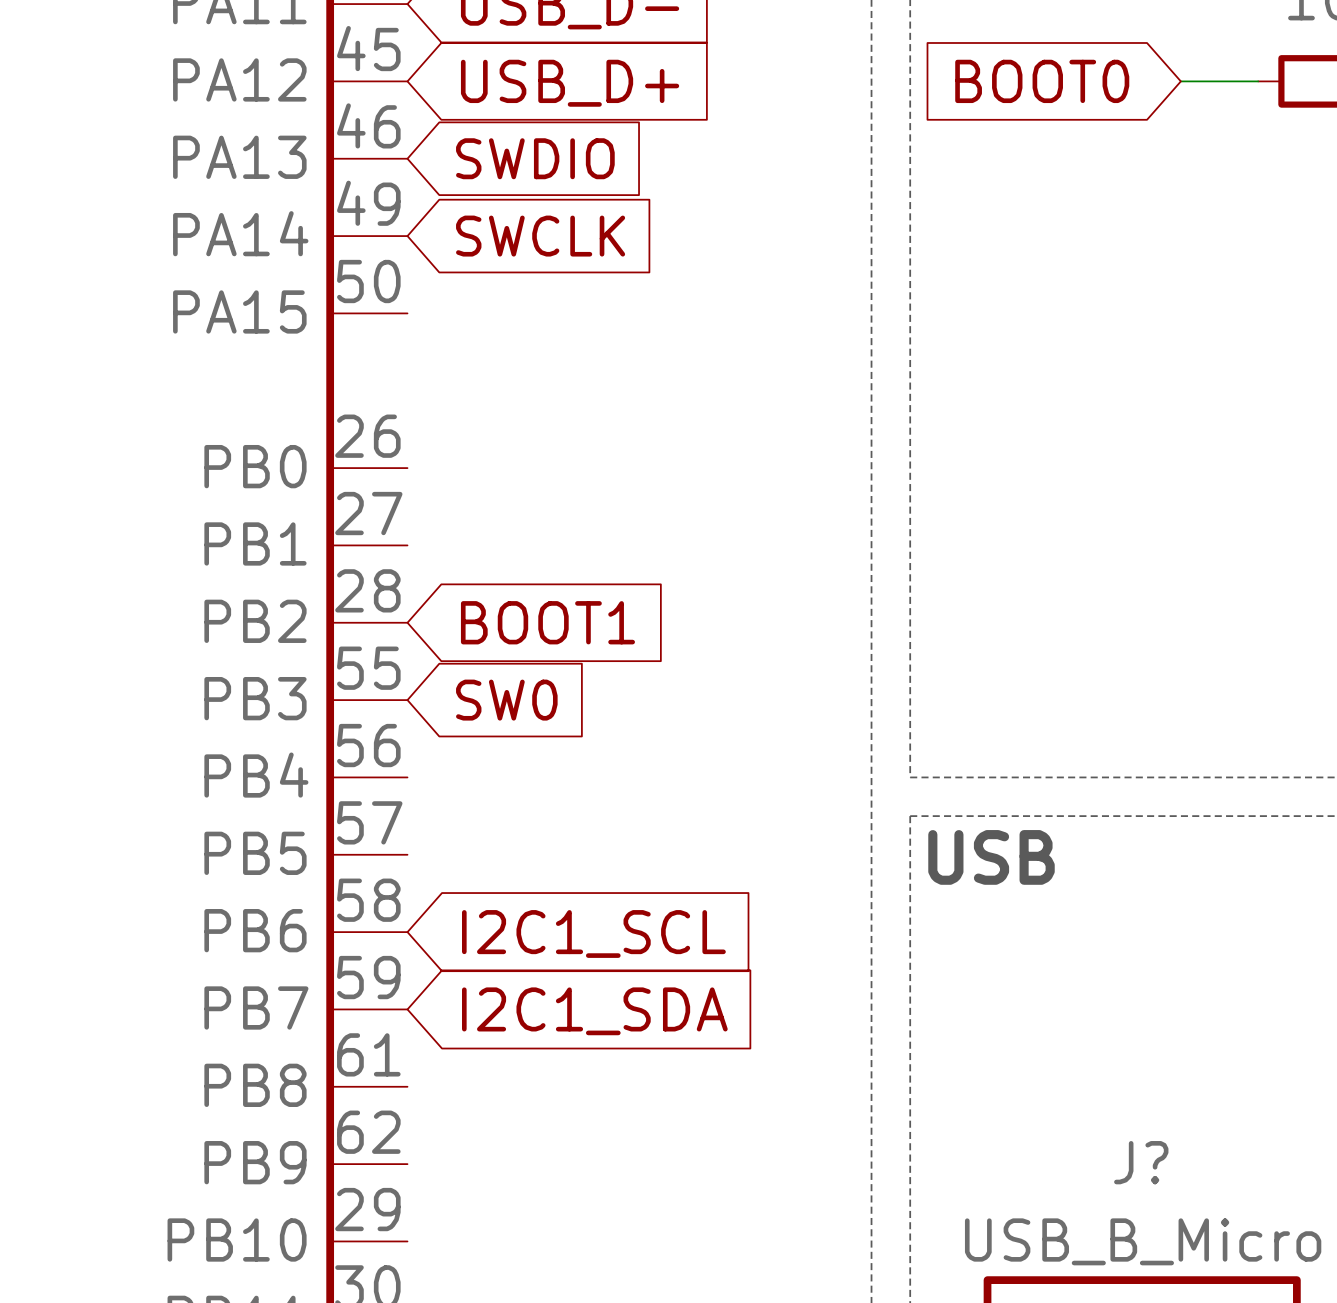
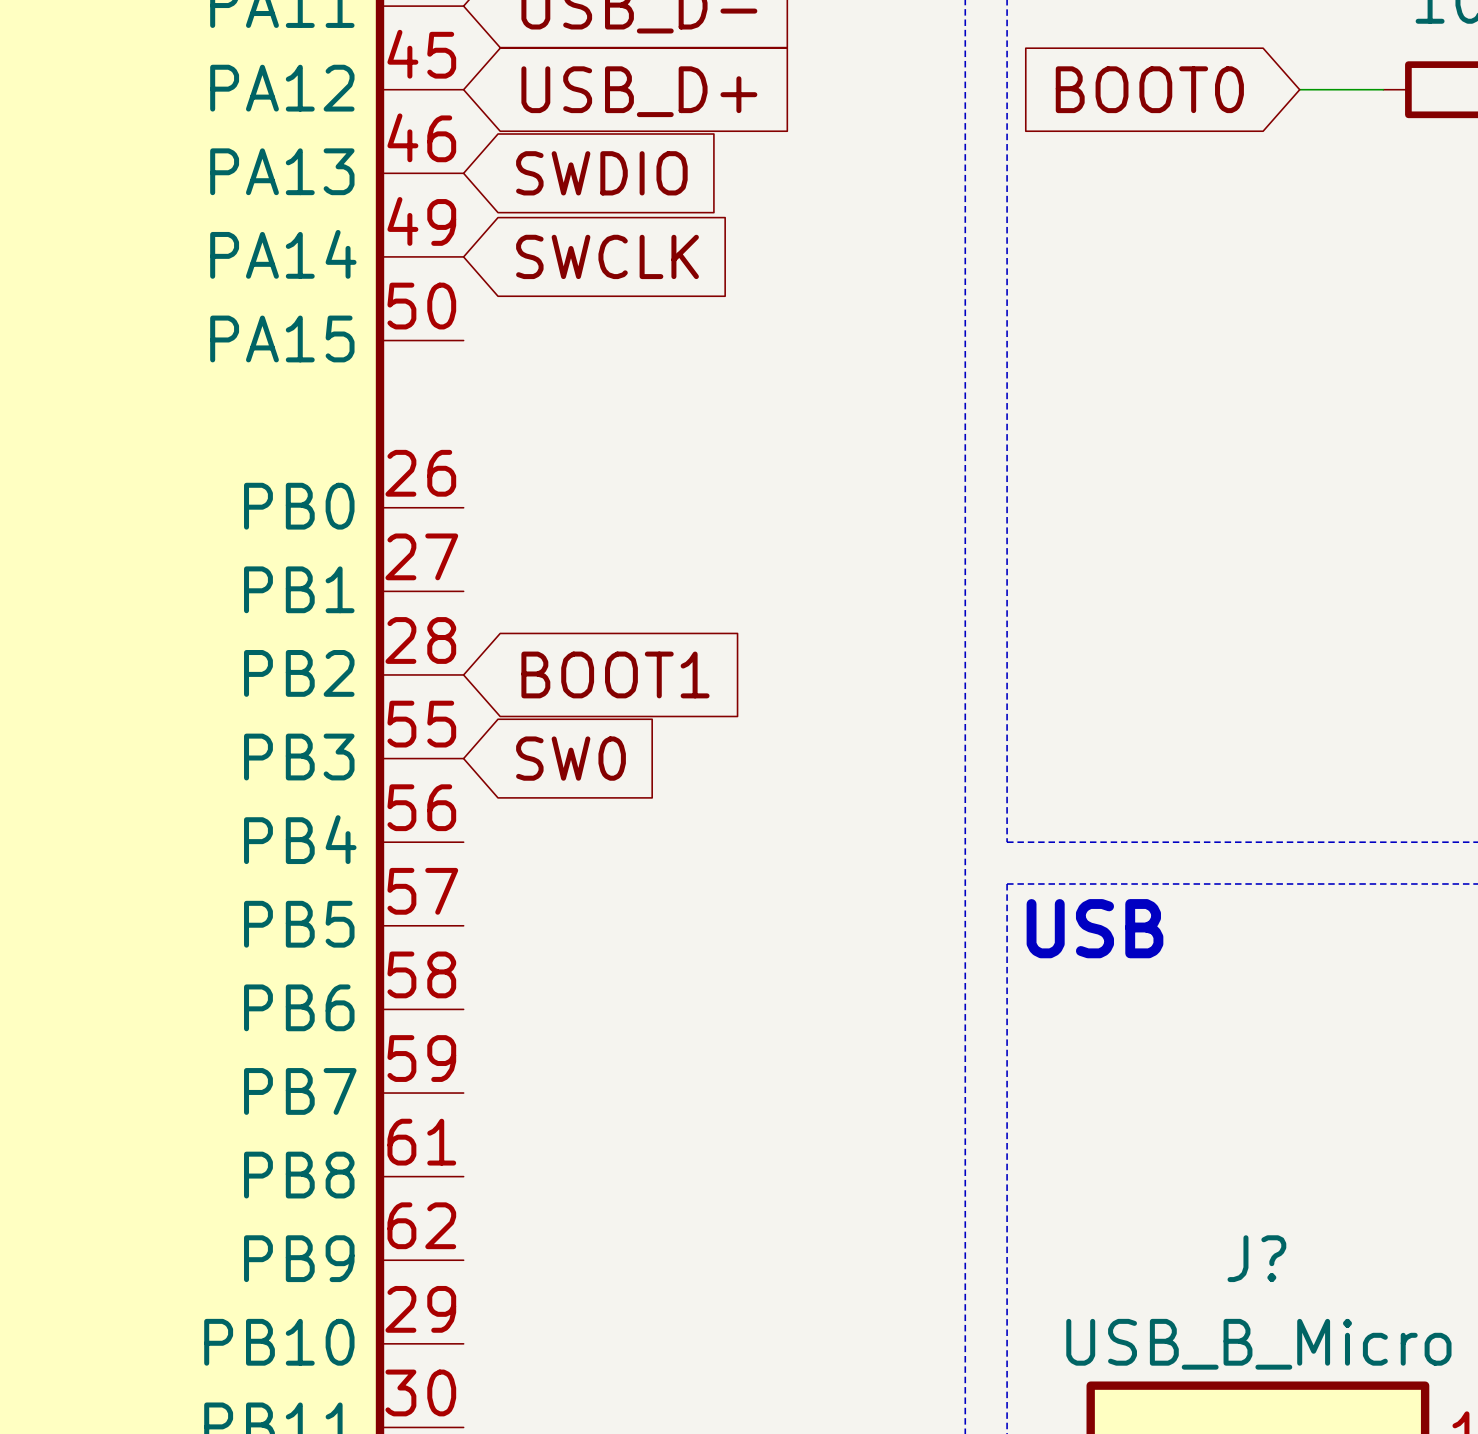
global label: I2C1_SCL (593, 933) -> none
global label: I2C1_SDA (594, 1011) -> none

